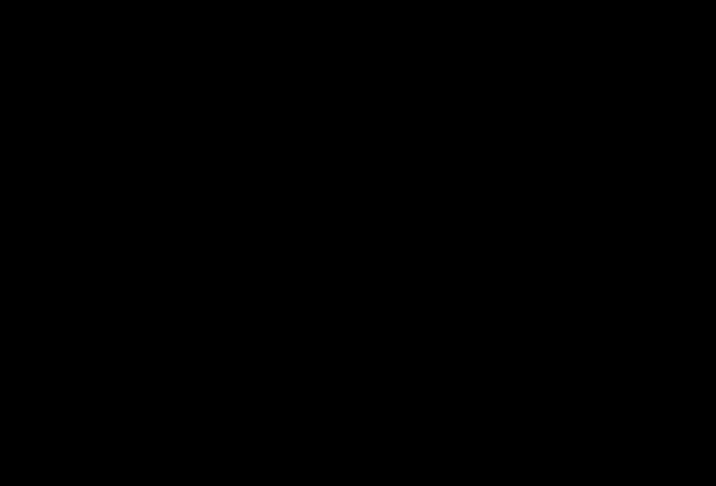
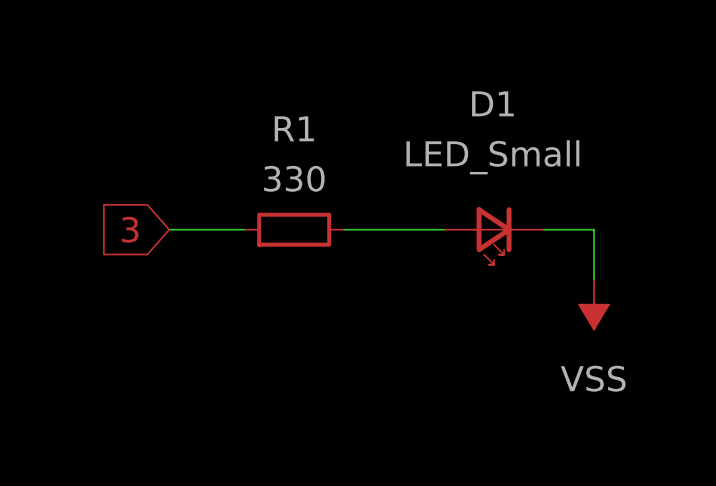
global label: none -> 3 (130, 229)
wire: none -> (169, 229) (244, 229)
R1: none -> 330 (294, 229)
wire: none -> (344, 229) (444, 229)
wire: none -> (544, 229) (594, 229) (594, 279)
D1: none -> LED_Small (494, 235)
power symbol: none -> VSS (594, 304)

